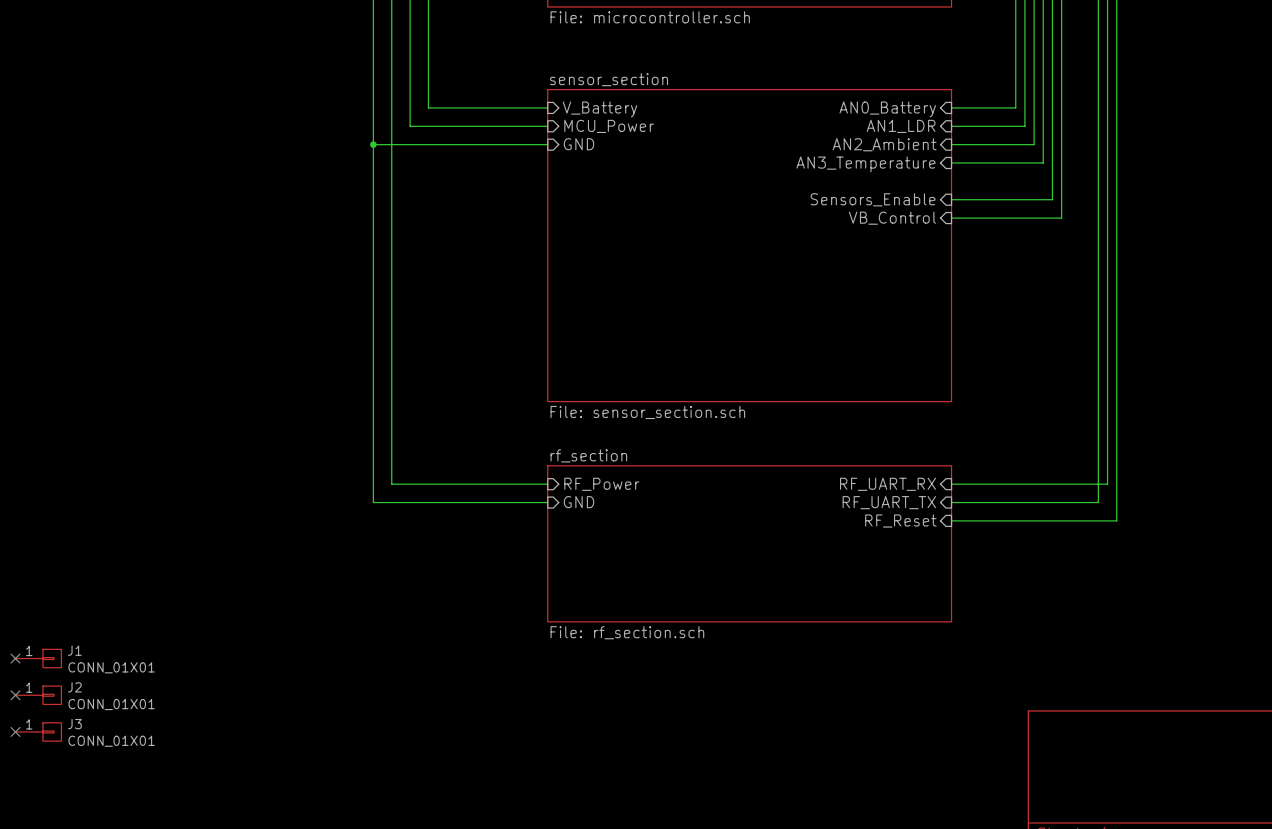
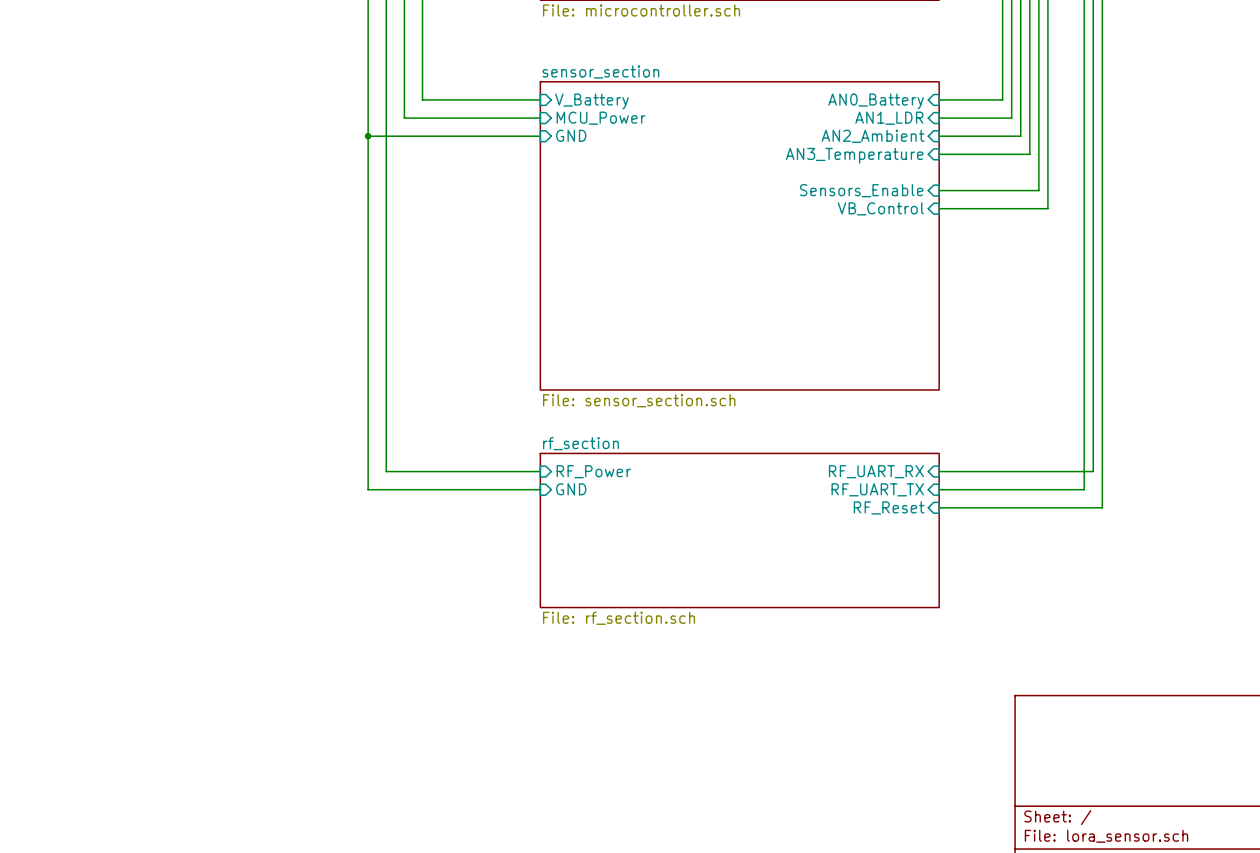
no-connect mark: (15, 658) -> none
J1: CONN_01X01 (38, 658) -> none
no-connect mark: (15, 695) -> none
J2: CONN_01X01 (38, 695) -> none
no-connect mark: (15, 731) -> none
J3: CONN_01X01 (38, 731) -> none

